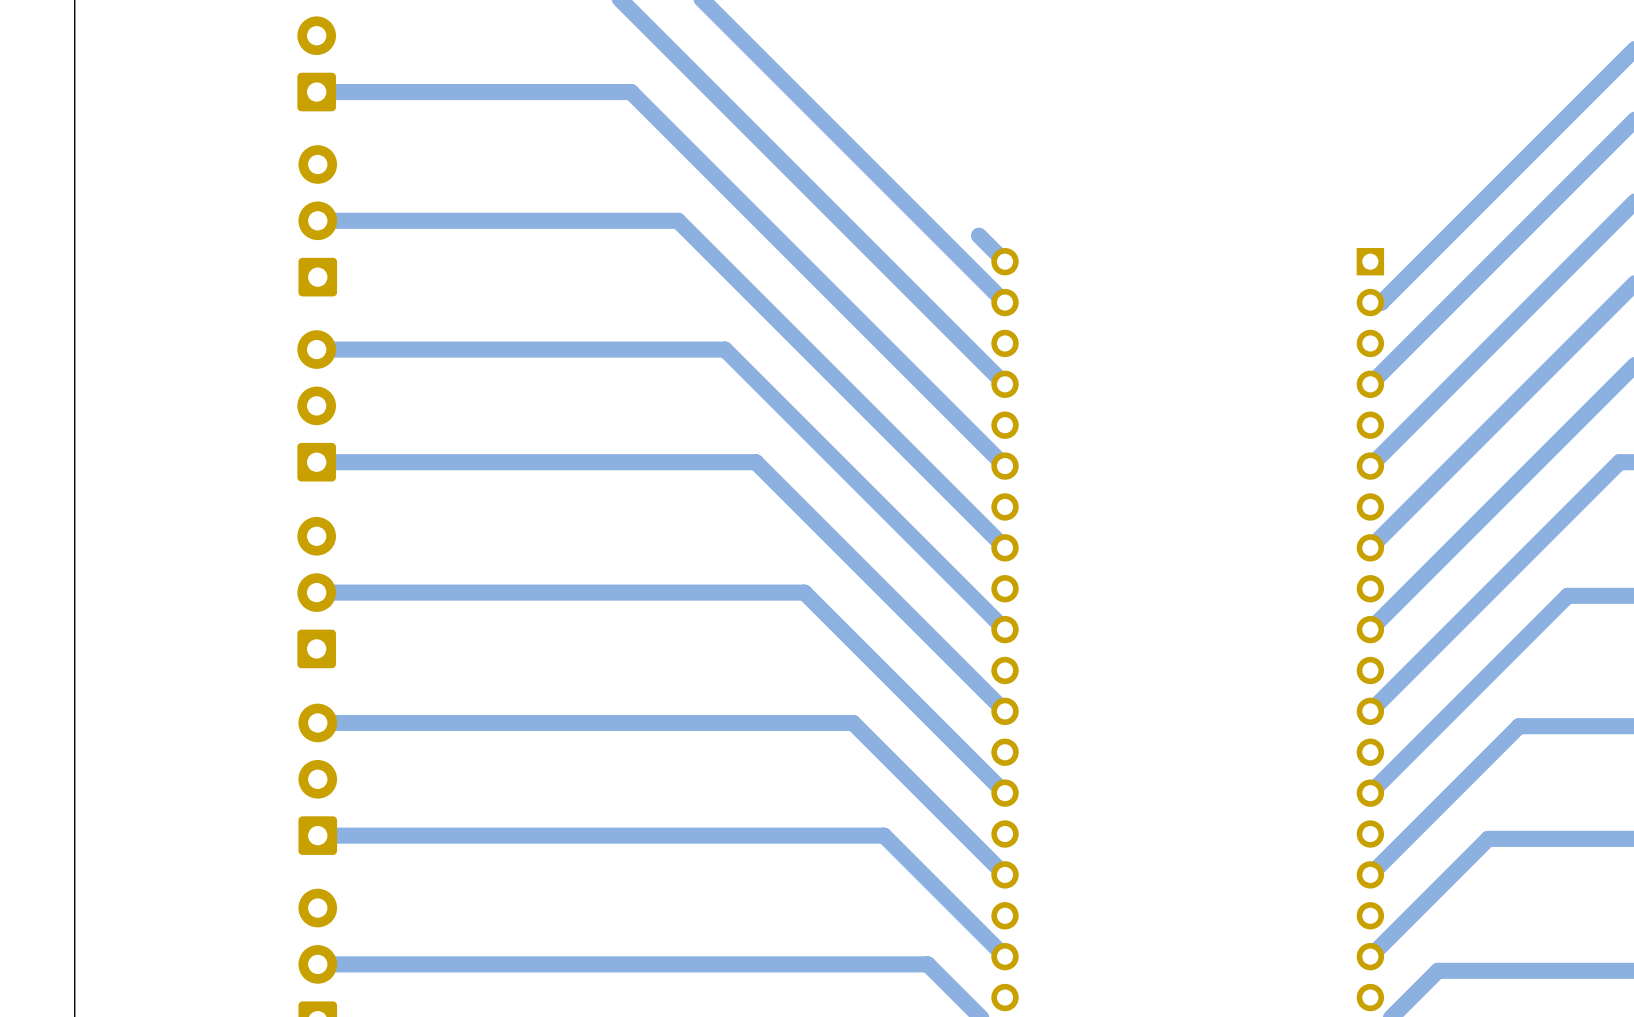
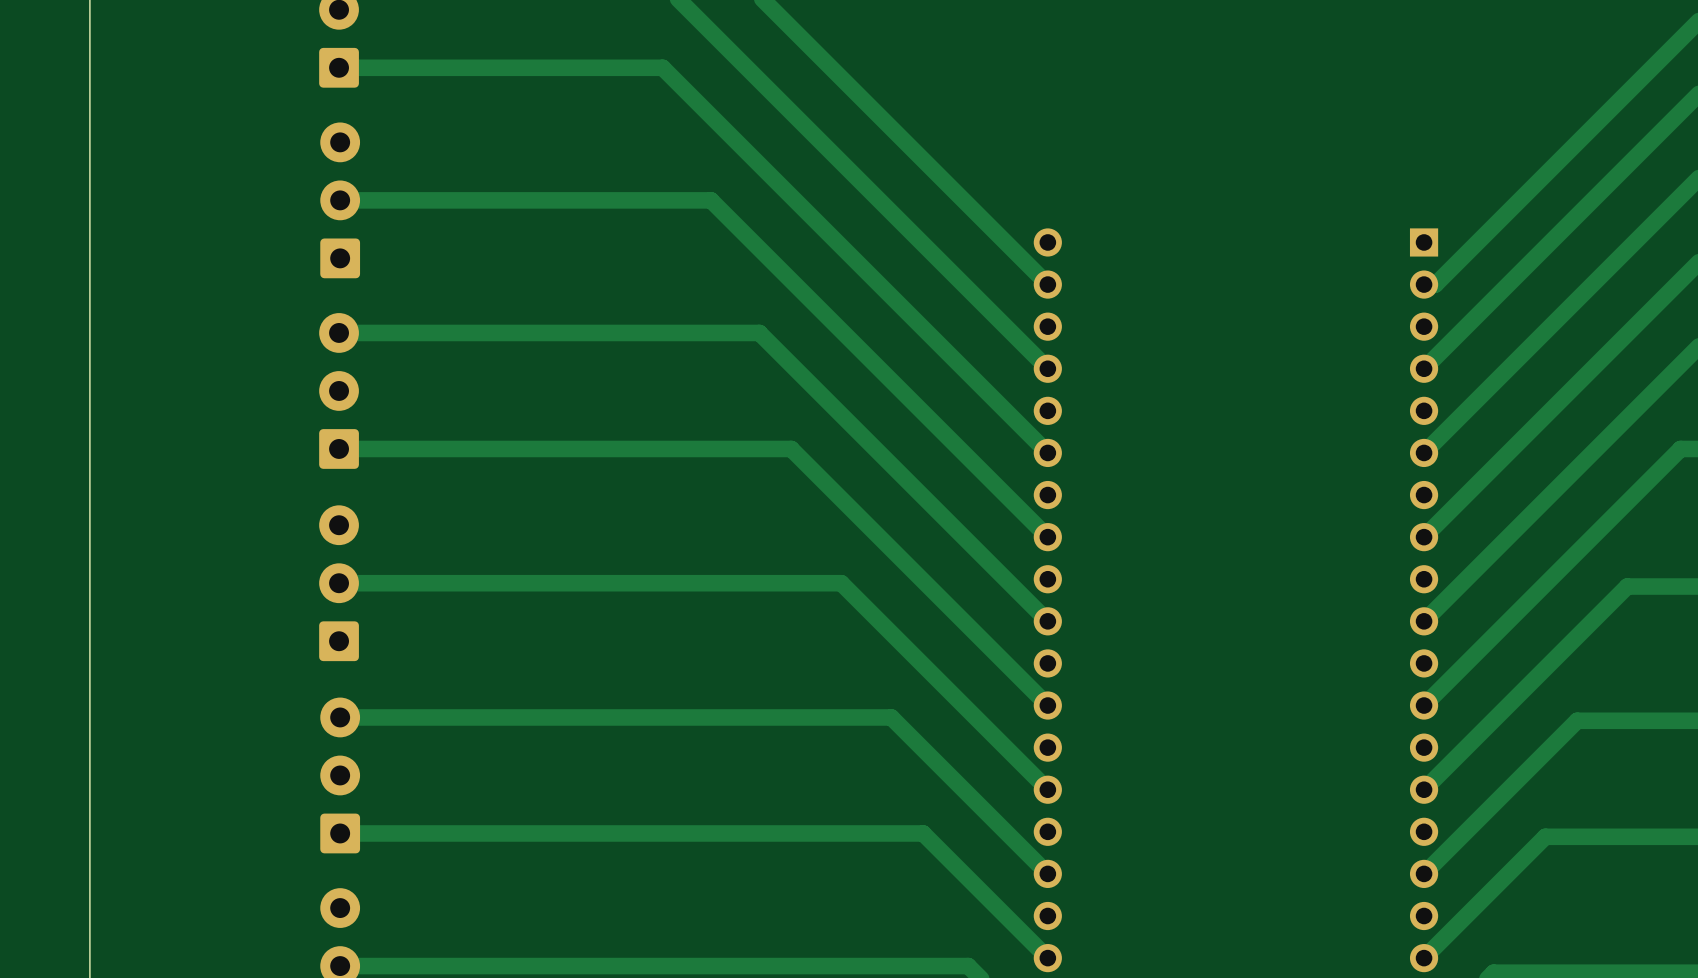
track: (978, 235) (1005, 261) -> none

